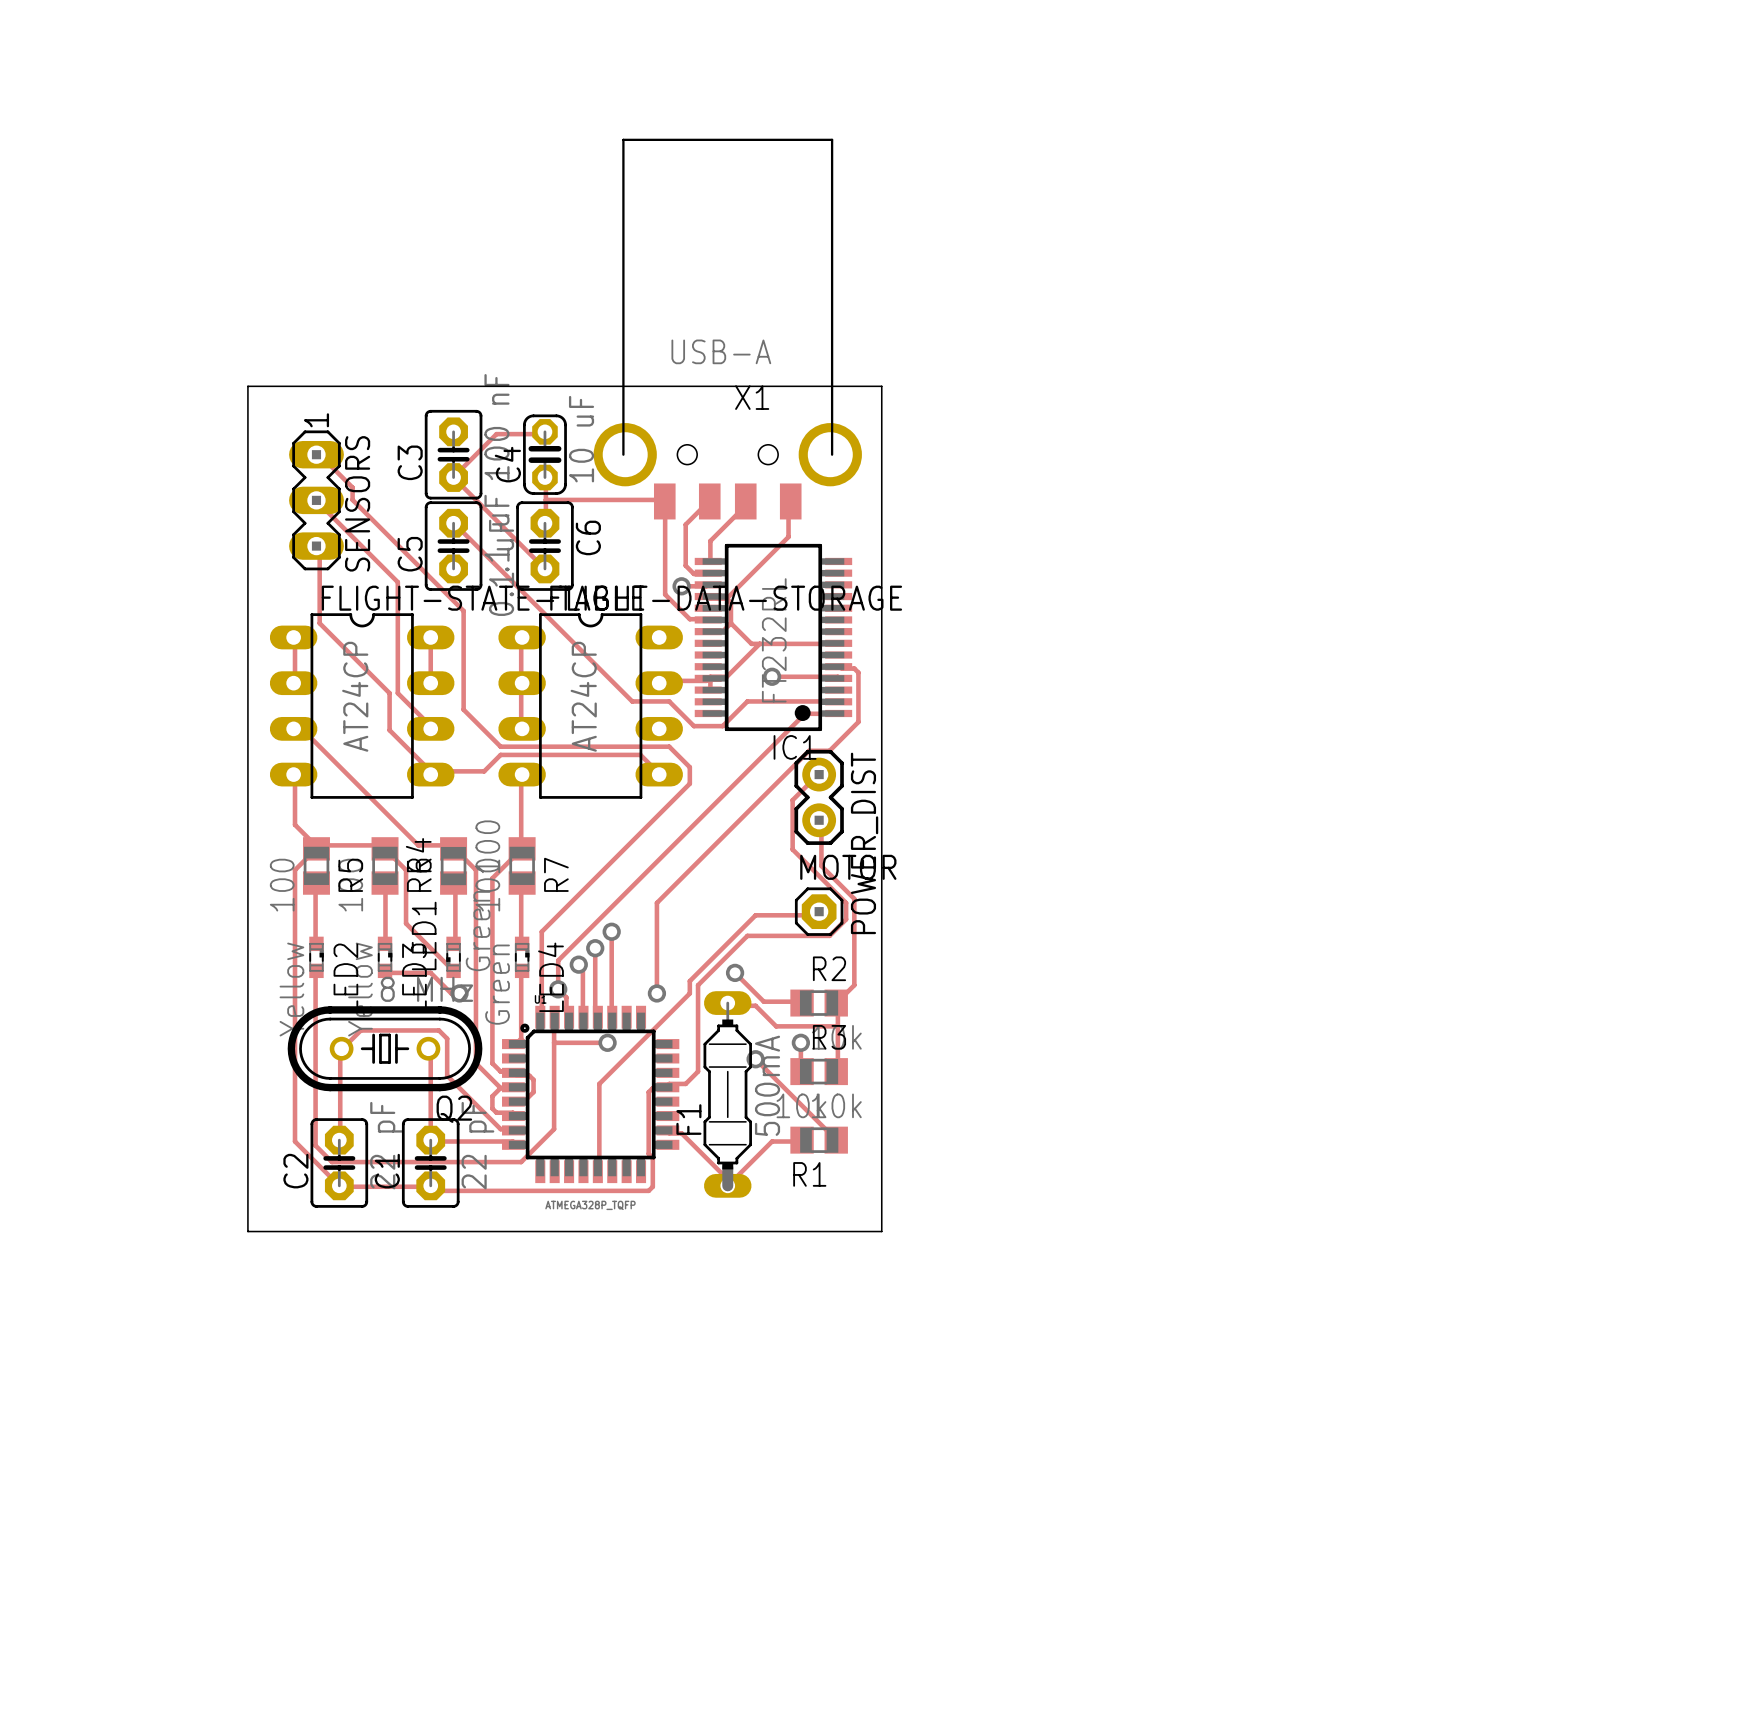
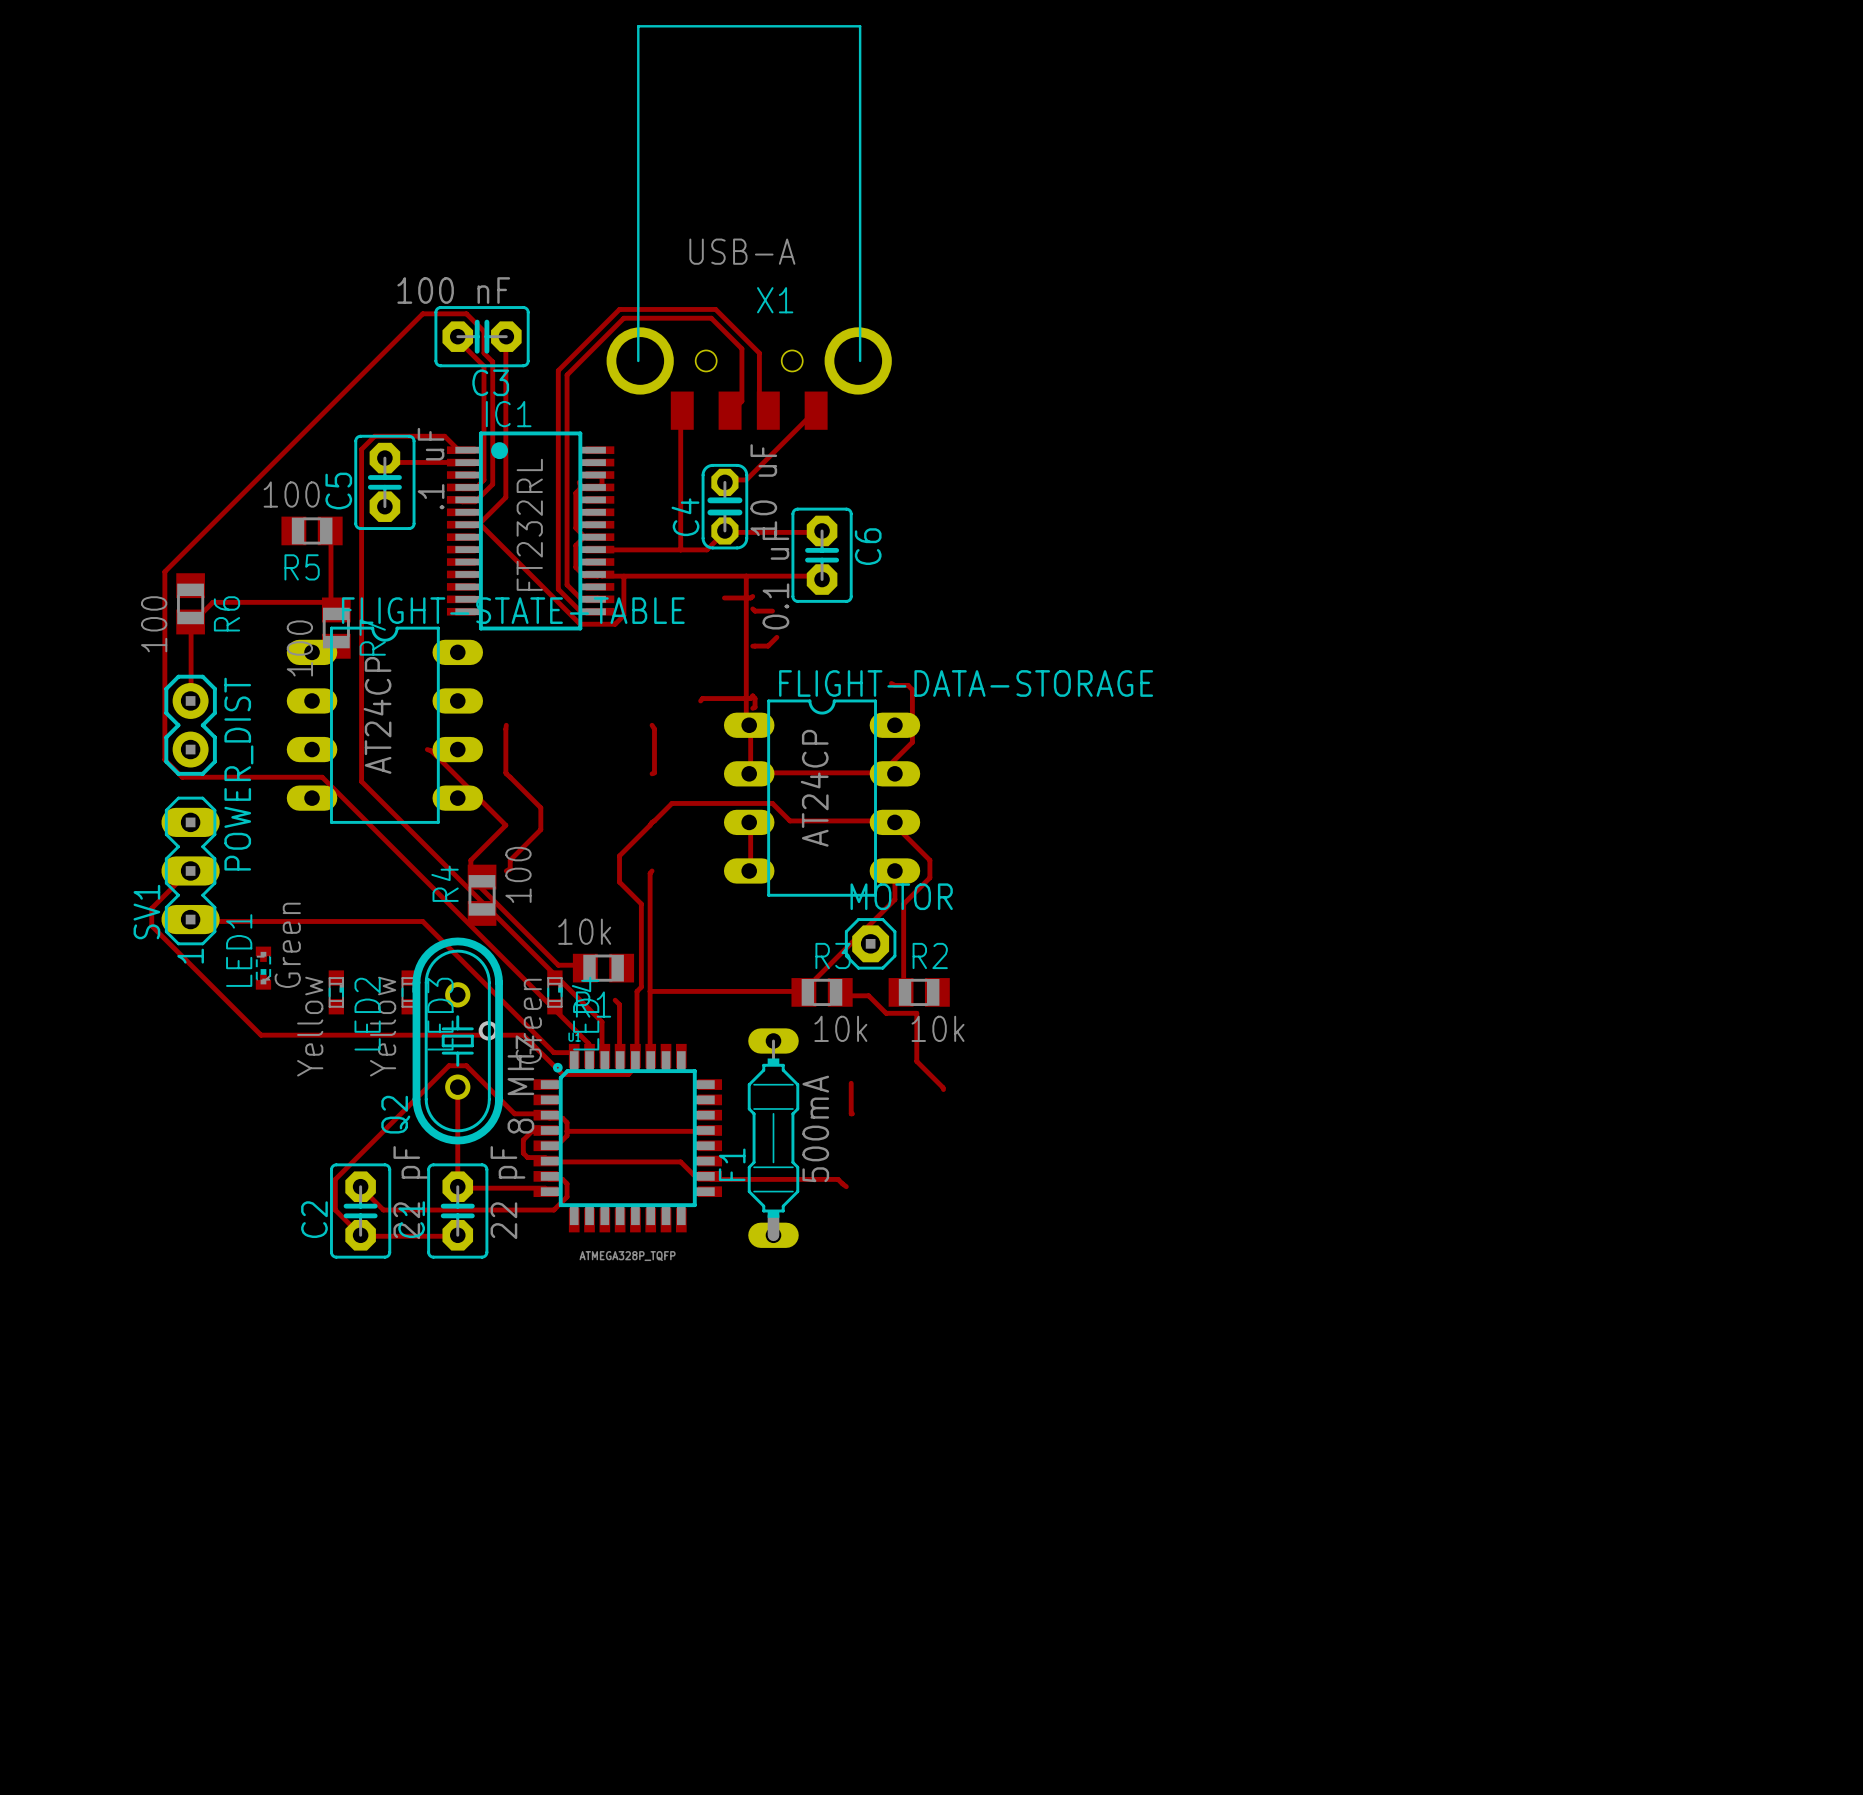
X1 position: (727, 329) -> (749, 227)
track: none -> (457, 336) (457, 340) (483, 366) (483, 479) (475, 488) (461, 487)
track: none -> (506, 336) (505, 497) (479, 523)
board edge: (247, 386) (881, 386) (881, 1231) (247, 1231) (247, 386) -> none
track: none -> (682, 410) (680, 414) (680, 549)
track: none -> (730, 410) (741, 401) (741, 348) (711, 318) (623, 318) (567, 375) (567, 584) (580, 597) (599, 599)
track: none -> (768, 410) (759, 401) (759, 353) (715, 309) (619, 309) (558, 370) (558, 589) (580, 611) (599, 611)
track: none -> (816, 410) (746, 479) (728, 479) (724, 482)
C3 value position: 100 nF (496, 427) -> 100 nF (453, 290)
track: (544, 431) (541, 434) (496, 434) (453, 477) (544, 568) -> none
track: (316, 454) (319, 454) (352, 487) (352, 499) (463, 610) (463, 709) (500, 746) (669, 746) (689, 767) (689, 783) (541, 931) (540, 1017) -> (190, 919) (191, 921) (422, 921) (553, 1052) (571, 1052) (574, 1056)
track: none -> (384, 458) (392, 462) (461, 462)
C3 rotation: 0° (453, 454) -> 90° clockwise (482, 336)
C3 position: (453, 454) -> (482, 336)
C4 position: (544, 454) -> (724, 506)
C3 name position: C3 (410, 462) -> C3 (490, 382)
track: none -> (599, 475) (602, 475) (602, 484) (599, 487) (580, 488) (575, 493) (575, 528) (584, 536)
track: none -> (461, 499) (462, 501) (475, 501) (492, 484) (492, 361) (483, 353) (483, 331) (466, 313) (422, 313) (164, 571) (164, 759) (182, 777) (322, 777) (588, 1043) (589, 1056)
track: (545, 499) (664, 501) (665, 594) (689, 619) (708, 619) -> none
track: (316, 500) (397, 582) (397, 693) (430, 726) (430, 728) -> none
SENSORS: (316, 500) -> none
track: (709, 501) (685, 524) (685, 565) (693, 573) (708, 573) -> none
track: (745, 501) (747, 504) (710, 541) (710, 561) (708, 561) -> none
track: (790, 501) (788, 504) (788, 536) (726, 598) (730, 602) (730, 623) (751, 643) (838, 643) -> none
track: none -> (479, 523) (580, 624) (615, 624) (623, 615) (623, 576)
track: none -> (330, 530) (330, 602)
track: (453, 523) (632, 701) (669, 701) (693, 726) (722, 726) (747, 701) (838, 701) -> none
track: none -> (822, 530) (724, 530) (706, 549) (599, 549)
track: none -> (584, 536) (575, 545) (575, 567) (584, 576) (599, 574) (602, 576) (820, 576) (822, 579)
track: (316, 546) (319, 549) (319, 623) (389, 693) (389, 730) (430, 771) -> none
C5 position: (453, 546) -> (384, 482)
C6 position: (544, 546) -> (822, 555)
track: none -> (746, 576) (746, 724) (749, 725) (750, 729) (750, 772)
via: (681, 586) -> none
track: none -> (330, 602) (212, 602) (191, 624)
track: none -> (191, 624) (190, 700)
track: (293, 637) (293, 683) -> none
track: (430, 637) (430, 683) -> none
track: (522, 637) (522, 728) -> none
IC1 rotation: 0° (773, 637) -> 180° (530, 530)
IC1 position: (773, 637) -> (530, 530)
track: (759, 643) (726, 676) (708, 678) -> none
track: (772, 676) (837, 676) (838, 678) -> none
via: (772, 676) -> none
POWER_DIST: none -> (190, 725)
track: none -> (506, 725) (505, 772) (540, 807) (540, 829) (510, 860) (510, 869) (506, 870)
FLIGHT-DATA-STORAGE position: (590, 706) -> (822, 798)
track: none -> (652, 725) (654, 729) (654, 772) (652, 773)
track: (838, 713) (804, 713) (558, 960) (558, 989) (566, 997) -> (461, 450) (457, 449) (444, 436) (374, 436) (361, 449) (361, 781) (602, 1022) (602, 1035)
track: (293, 728) (303, 730) (418, 845) (451, 845) (475, 870) (475, 1063) -> none
track: none -> (427, 749) (431, 751) (505, 825) (470, 860) (470, 877) (558, 965) (584, 965) (585, 968)
track: (809, 750) (656, 902) (656, 993) -> (859, 772) (750, 772)
track: (430, 771) (484, 771) (500, 754) (640, 754) (659, 774) -> none
track: (293, 774) (295, 824) (315, 845) (316, 848) -> none
track: (522, 774) (522, 848) (492, 878) (492, 1063) (500, 1071) -> none
track: (819, 774) (792, 800) (792, 849) (846, 902) (846, 919) (829, 935) (747, 935) (698, 985) (698, 1071) (685, 1083) (669, 1083) (667, 1087) -> none
track: none -> (749, 822) (749, 870)
POWER_DIST: (819, 797) -> none
track: (819, 820) (821, 820) (821, 865) (854, 898) (854, 985) (836, 1003) (837, 1005) (837, 1071) (836, 1071) -> none
track: none -> (190, 870) (151, 908) (151, 925) (261, 1035) (523, 1035) (562, 1074) (628, 1074) (632, 1070) (632, 1057) (637, 1052) (637, 991) (641, 987) (641, 904) (619, 882) (619, 855) (671, 803) (772, 803) (790, 820) (894, 820) (894, 825) (929, 860) (929, 877) (903, 904) (903, 991) (901, 992)
SV1: none -> (190, 870)
track: none -> (652, 870) (650, 873) (650, 965)
track: none -> (894, 870) (894, 899) (803, 991)
track: (316, 848) (295, 870) (295, 1141) (315, 1162) -> (335, 1192) (335, 1210)
track: (316, 848) (319, 845) (381, 845) (406, 870) (406, 923) (453, 970) -> none
R5 rotation: 0° (316, 865) -> 90° clockwise (312, 530)
R5 position: (316, 865) -> (312, 530)
R6 position: (385, 865) -> (190, 603)
R7 position: (522, 865) -> (336, 628)
track: (316, 883) (316, 943) -> none
track: (385, 883) (385, 943) -> none
track: (453, 883) (455, 886) (455, 939) (453, 943) -> none
track: (522, 883) (522, 943) -> none
track: (819, 911) (817, 915) (755, 915) (689, 981) (689, 993) (599, 1083) (597, 1171) -> none
via: (611, 931) -> none
LED1 footprint: [446, 936, 461, 979] -> [255, 946, 272, 990]
track: (595, 948) (595, 1014) (597, 1017) -> none
via: (595, 948) -> none
track: none -> (650, 991) (803, 991)
track: none -> (840, 992) (842, 995) (868, 995) (886, 1013) (916, 1013) (916, 1061) (943, 1089)
via: (578, 964) -> none
track: (316, 970) (315, 1133) -> (505, 1105) (466, 1065) (449, 1065) (335, 1179)
track: (385, 970) (385, 972) (430, 972) (451, 993) (459, 993) -> none
track: (522, 970) (521, 1038) (513, 1044) -> none
track: (735, 972) (763, 1001) (802, 1003) -> none
via: (735, 972) -> none
via: (558, 989) -> none
via: (656, 993) -> none
track: (727, 1003) (730, 1005) (755, 1005) (776, 1026) (837, 1026) -> none
R2 position: (819, 1003) -> (919, 992)
track: (554, 1017) (554, 1129) (533, 1149) -> (545, 1176) (549, 1179) (562, 1179) (567, 1183) (567, 1196)
track: (554, 1042) (607, 1042) -> none
via: (607, 1042) -> none
via: (800, 1042) -> none
Q2 rotation: 0° (385, 1048) -> 90° clockwise (457, 1040)
track: (755, 1059) (836, 1140) -> none
via: (755, 1059) -> none
track: (484, 1071) (500, 1088) -> (514, 1113) (532, 1113)
R3 position: (819, 1071) -> (822, 992)
track: (652, 1088) (648, 1092) (648, 1153) (652, 1157) (652, 1186) (648, 1190) (434, 1190) (430, 1186) -> (693, 1131) (567, 1131)
track: none -> (545, 1161) (680, 1161) (693, 1175) (709, 1176)
track: (513, 1130) (500, 1129) (447, 1075) (447, 1038) (438, 1030) (360, 1030) (340, 1051) (339, 1140) -> none
track: (681, 1133) (730, 1182) -> (724, 1179) (838, 1179) (846, 1186)
track: (802, 1140) (772, 1141) (727, 1185) -> none
R1 position: (819, 1140) -> (603, 968)
track: (315, 1145) (332, 1162) (360, 1162) -> (360, 1186) (383, 1210)

